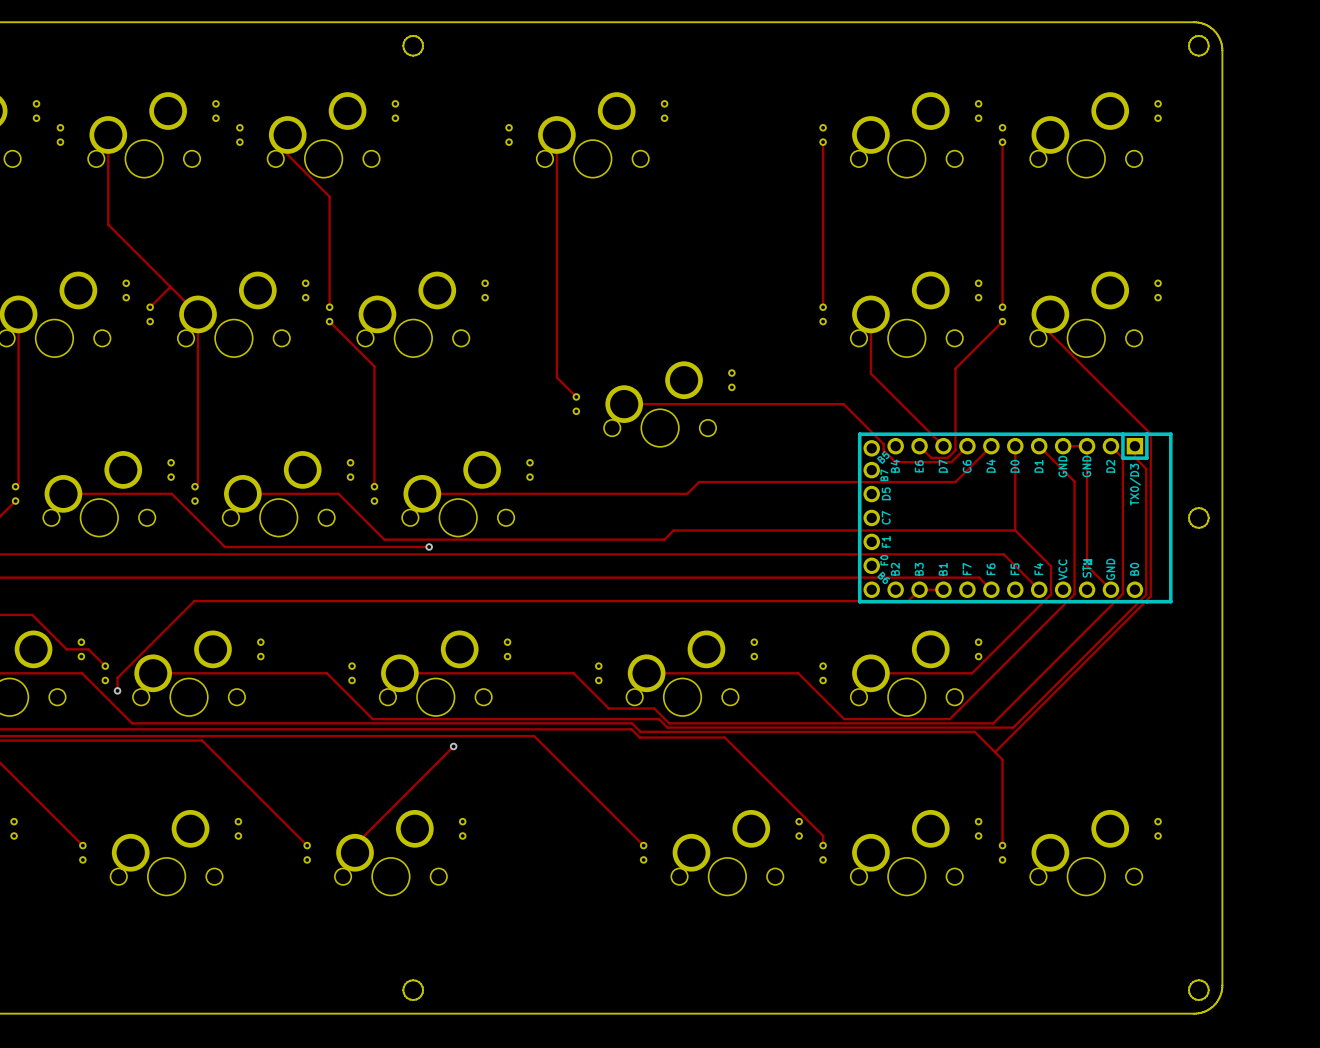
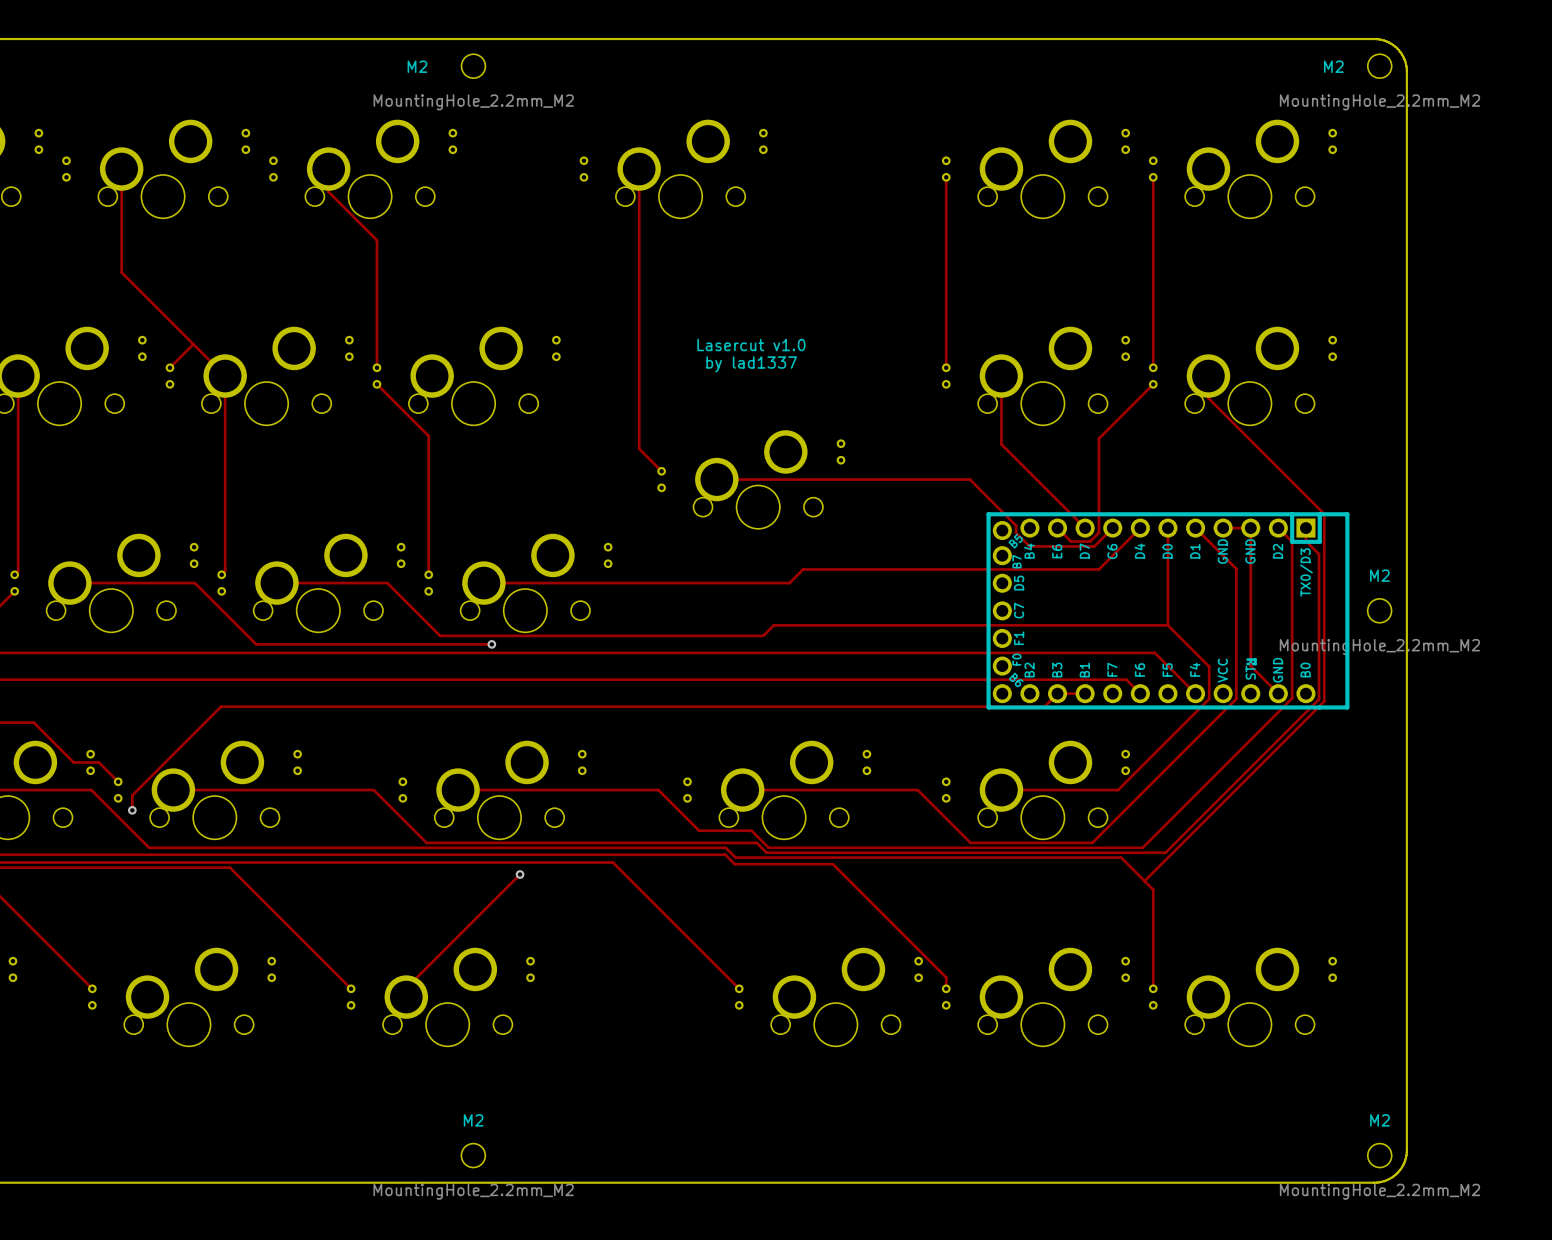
board edge: (413, 35) (419, 37) (423, 45) (419, 53) (413, 55) (405, 51) (403, 45) (407, 37) (413, 35) -> none
board edge: (1198, 35) (1193, 37) (1188, 45) (1190, 51) (1198, 55) (1204, 53) (1208, 45) (1204, 37) (1198, 35) -> none
M2: none -> MountingHole_2.2mm_M2 (473, 66)
M2: none -> MountingHole_2.2mm_M2 (1379, 66)
text: none -> Lasercut v1.0 (751, 345)
text: none -> by lad1337 (751, 364)
board edge: (1198, 508) (1204, 509) (1208, 517) (1204, 525) (1198, 527) (1193, 525) (1188, 517) (1193, 509) (1198, 508) -> none
M2: none -> MountingHole_2.2mm_M2 (1379, 610)
board edge: (413, 980) (407, 982) (403, 990) (407, 998) (413, 1000) (419, 998) (423, 990) (419, 982) (413, 980) -> none
board edge: (1198, 980) (1193, 982) (1188, 990) (1190, 995) (1198, 1000) (1204, 998) (1208, 990) (1204, 982) (1198, 980) -> none
M2: none -> MountingHole_2.2mm_M2 (473, 1155)
M2: none -> MountingHole_2.2mm_M2 (1379, 1155)

